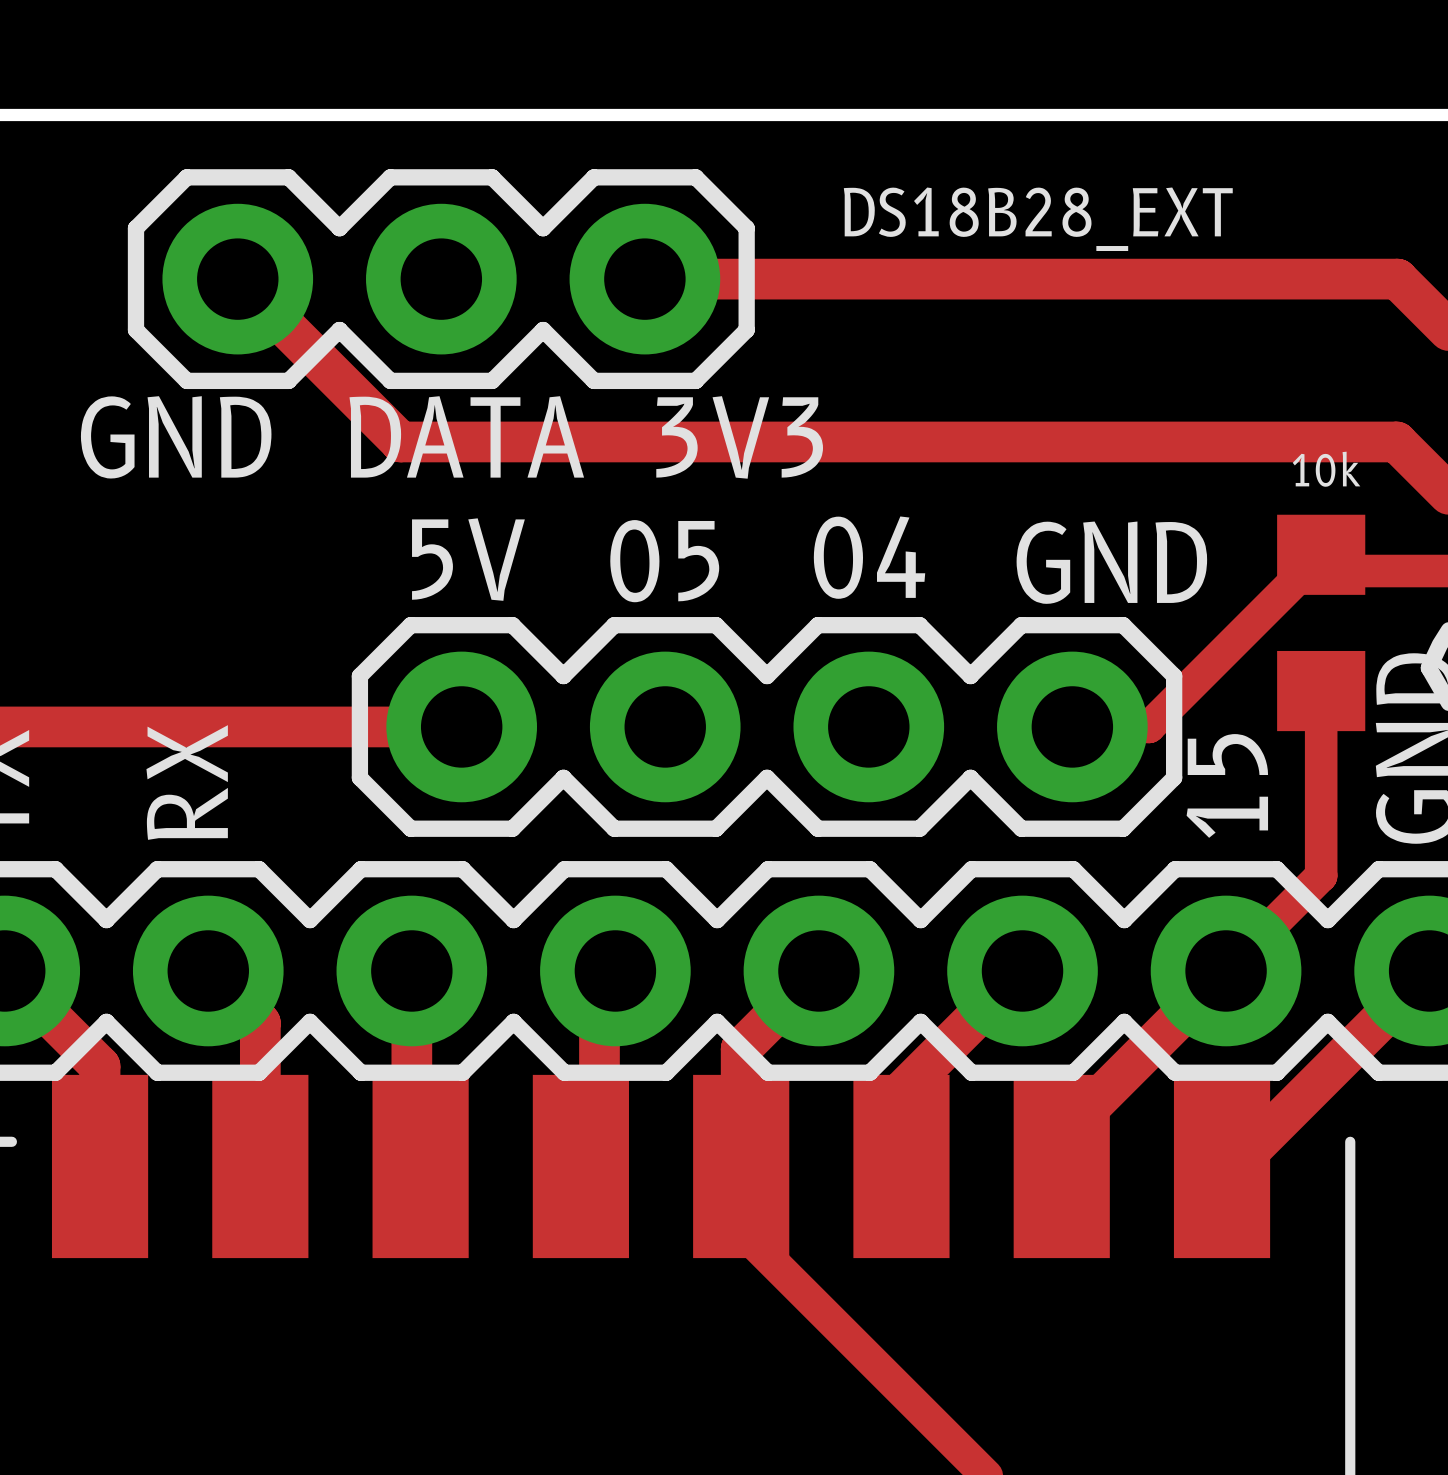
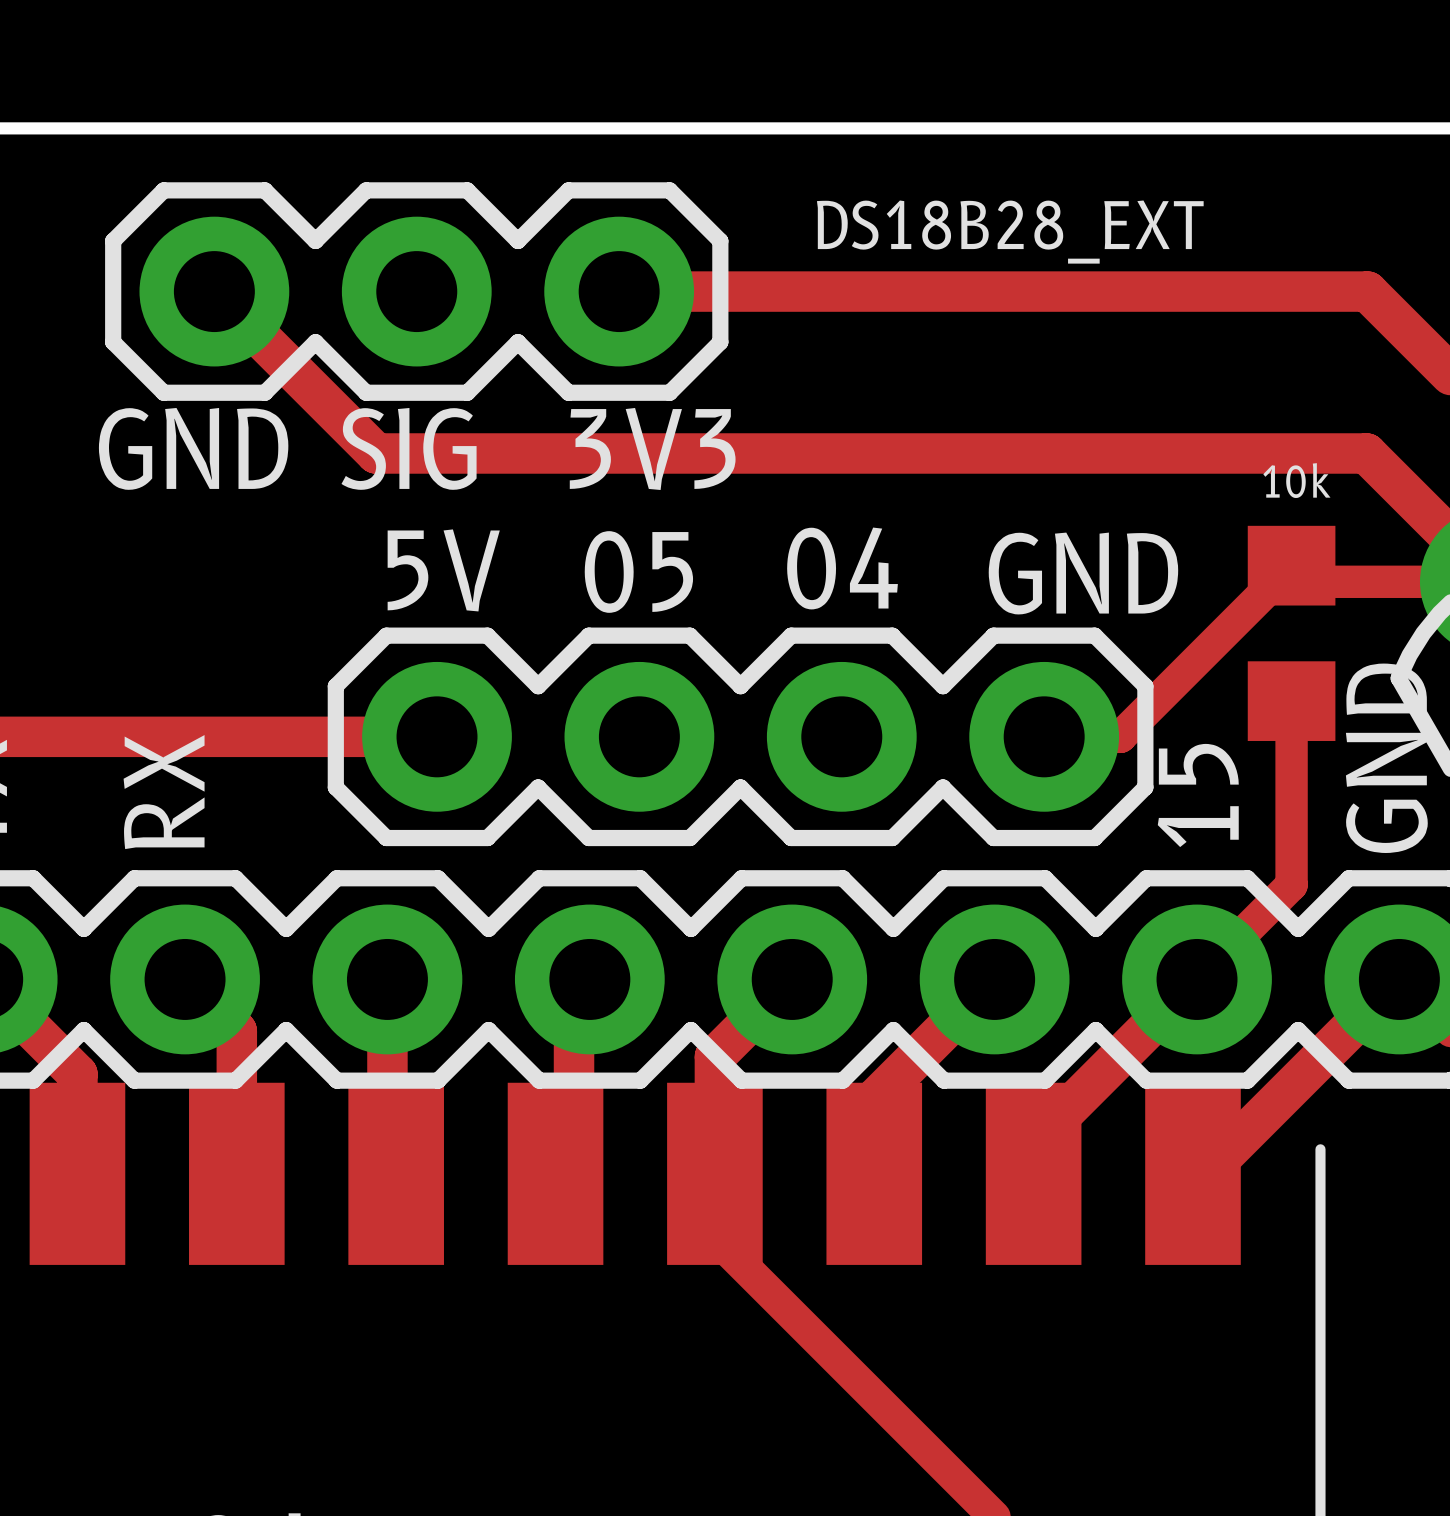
text: DATA (466, 436) -> SIG (409, 448)
text position: GND (176, 437) -> GND (193, 448)
text position: 3V3 (739, 437) -> 3V3 (652, 448)

